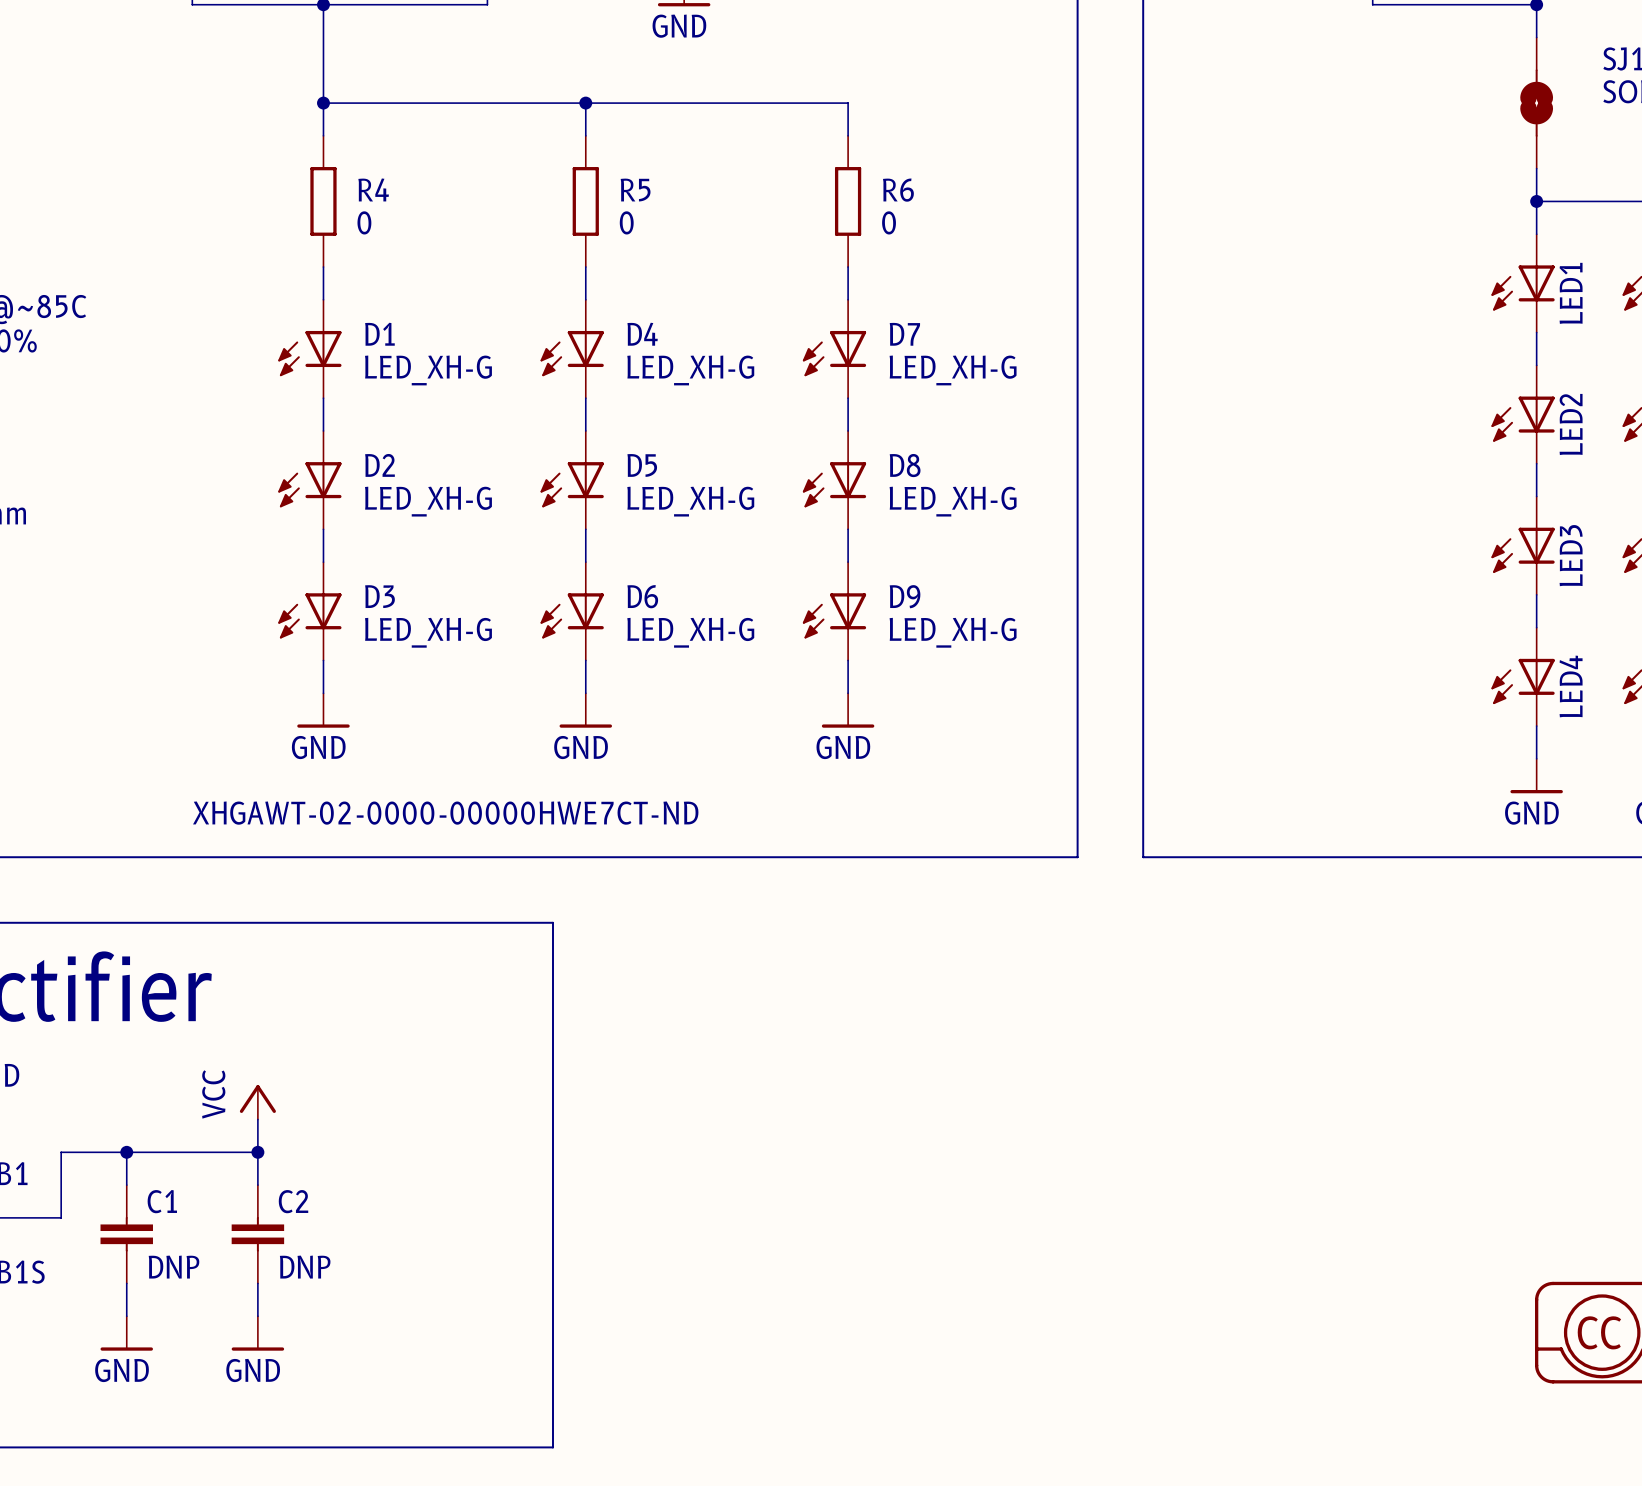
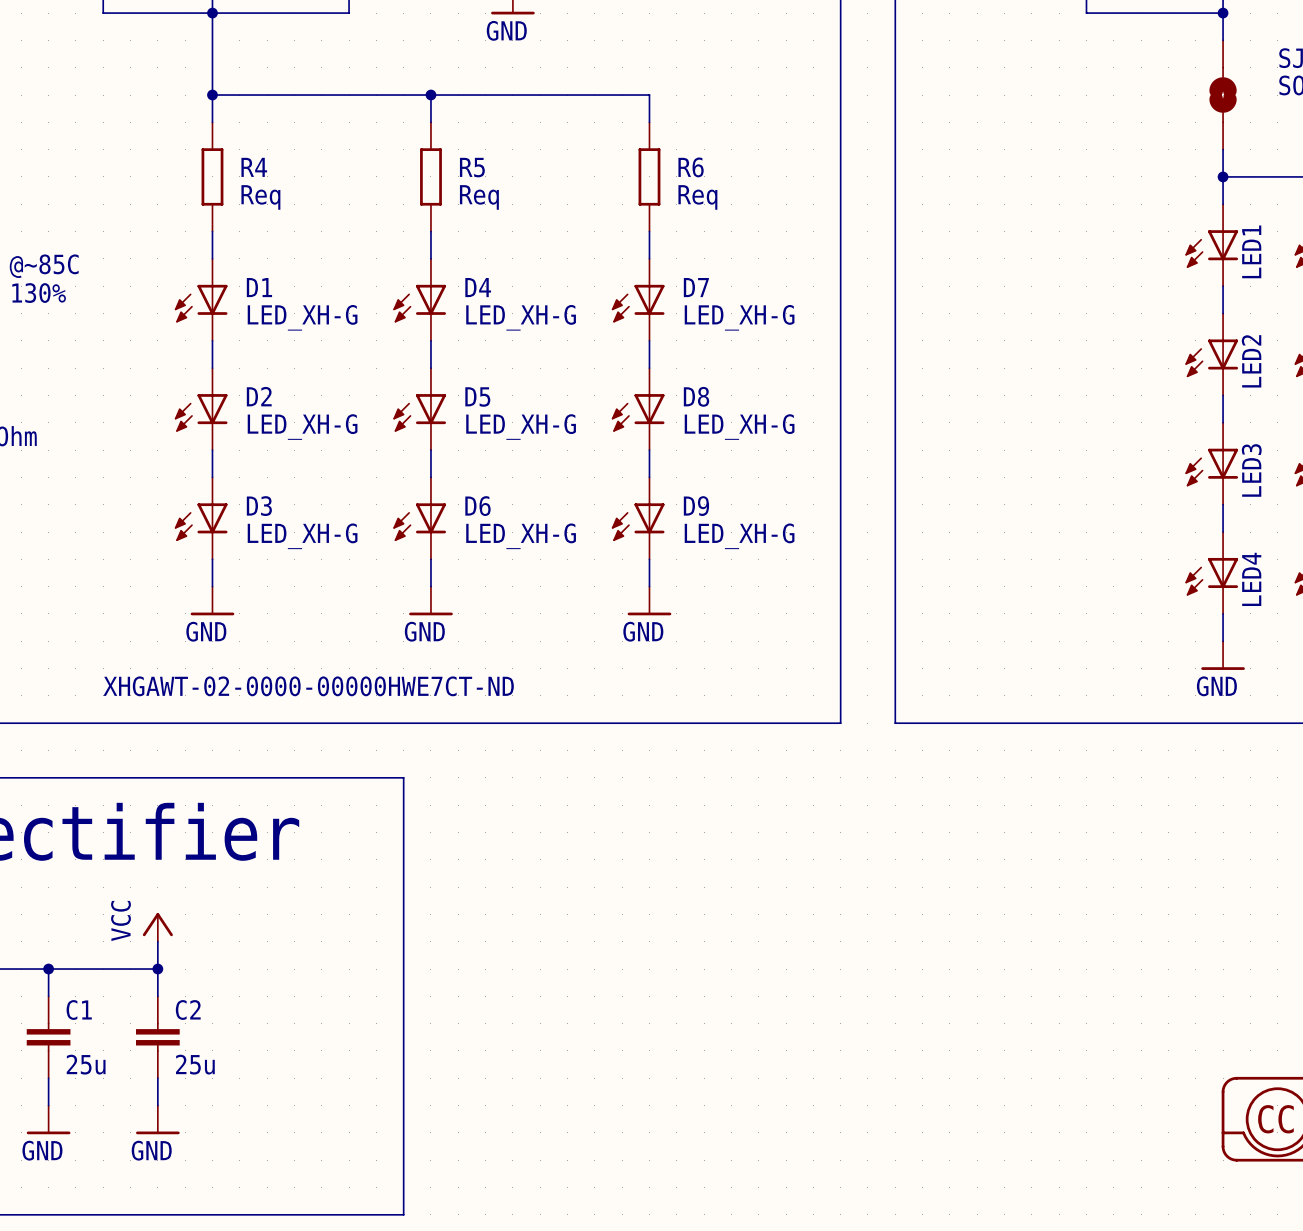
R4 value: 0 (364, 222) -> Req (260, 197)
R5 value: 0 (626, 222) -> Req (479, 197)
R6 value: 0 (889, 222) -> Req (697, 197)
C1 value: DNP (174, 1267) -> 25u (86, 1064)
C2 value: DNP (305, 1267) -> 25u (195, 1064)

